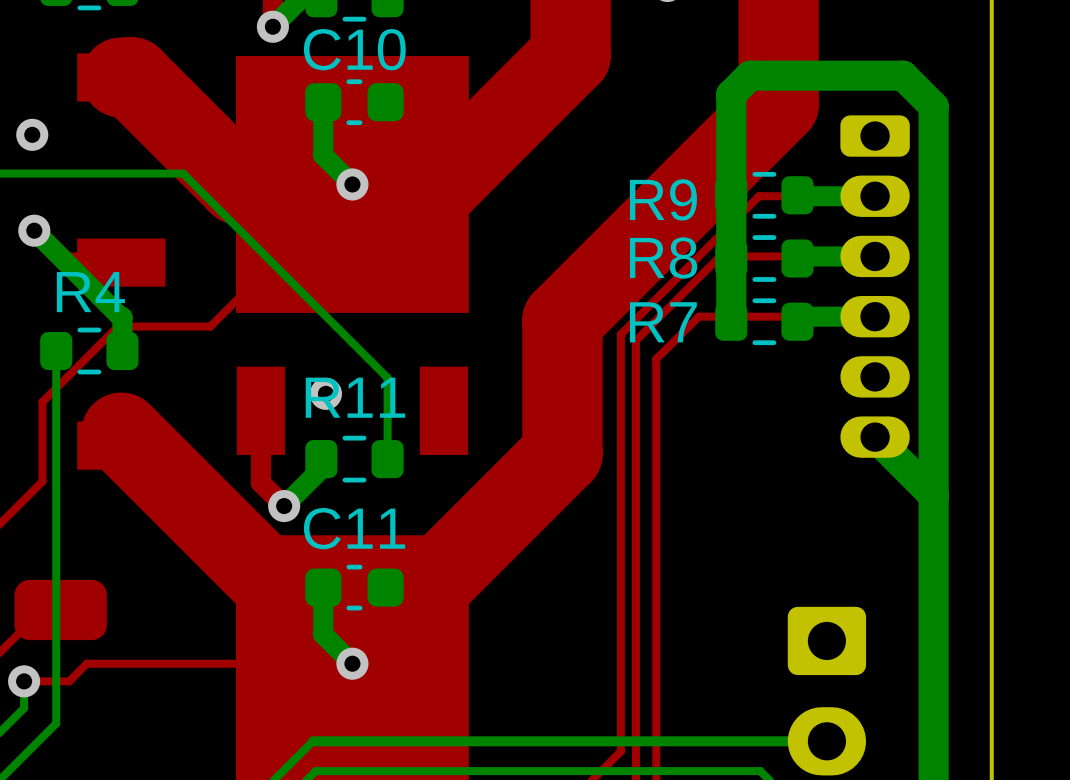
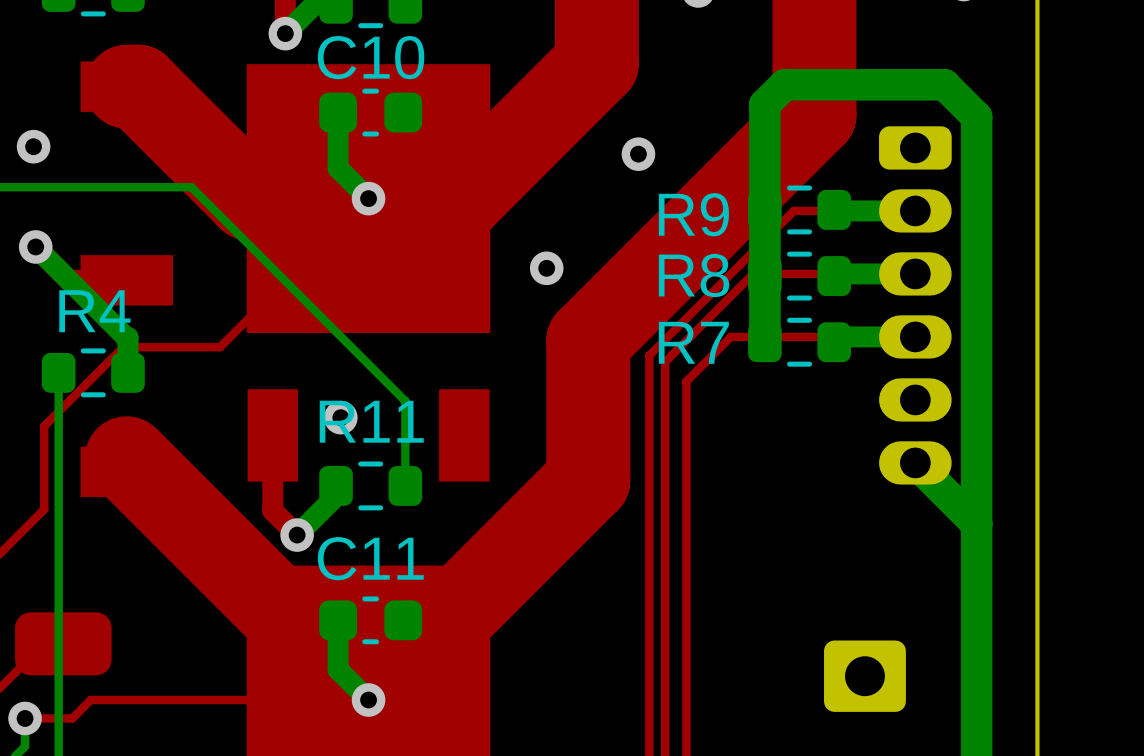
via: none -> (638, 154)
via: none -> (546, 268)

